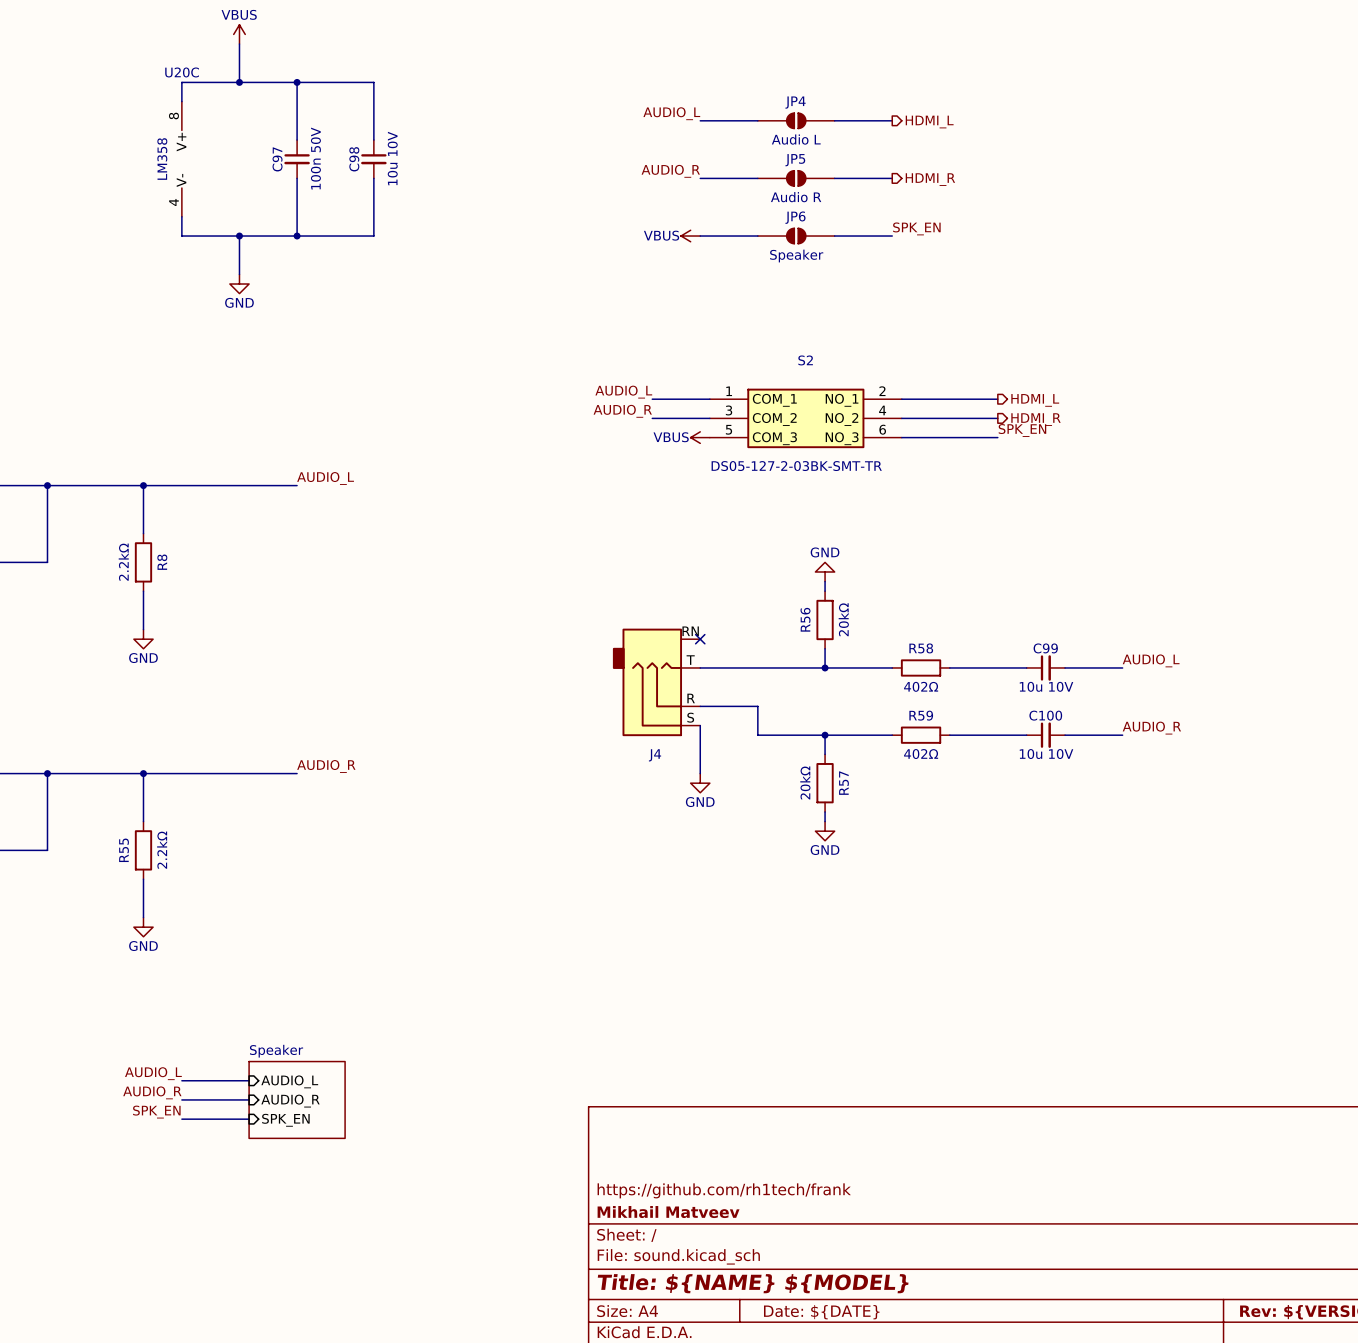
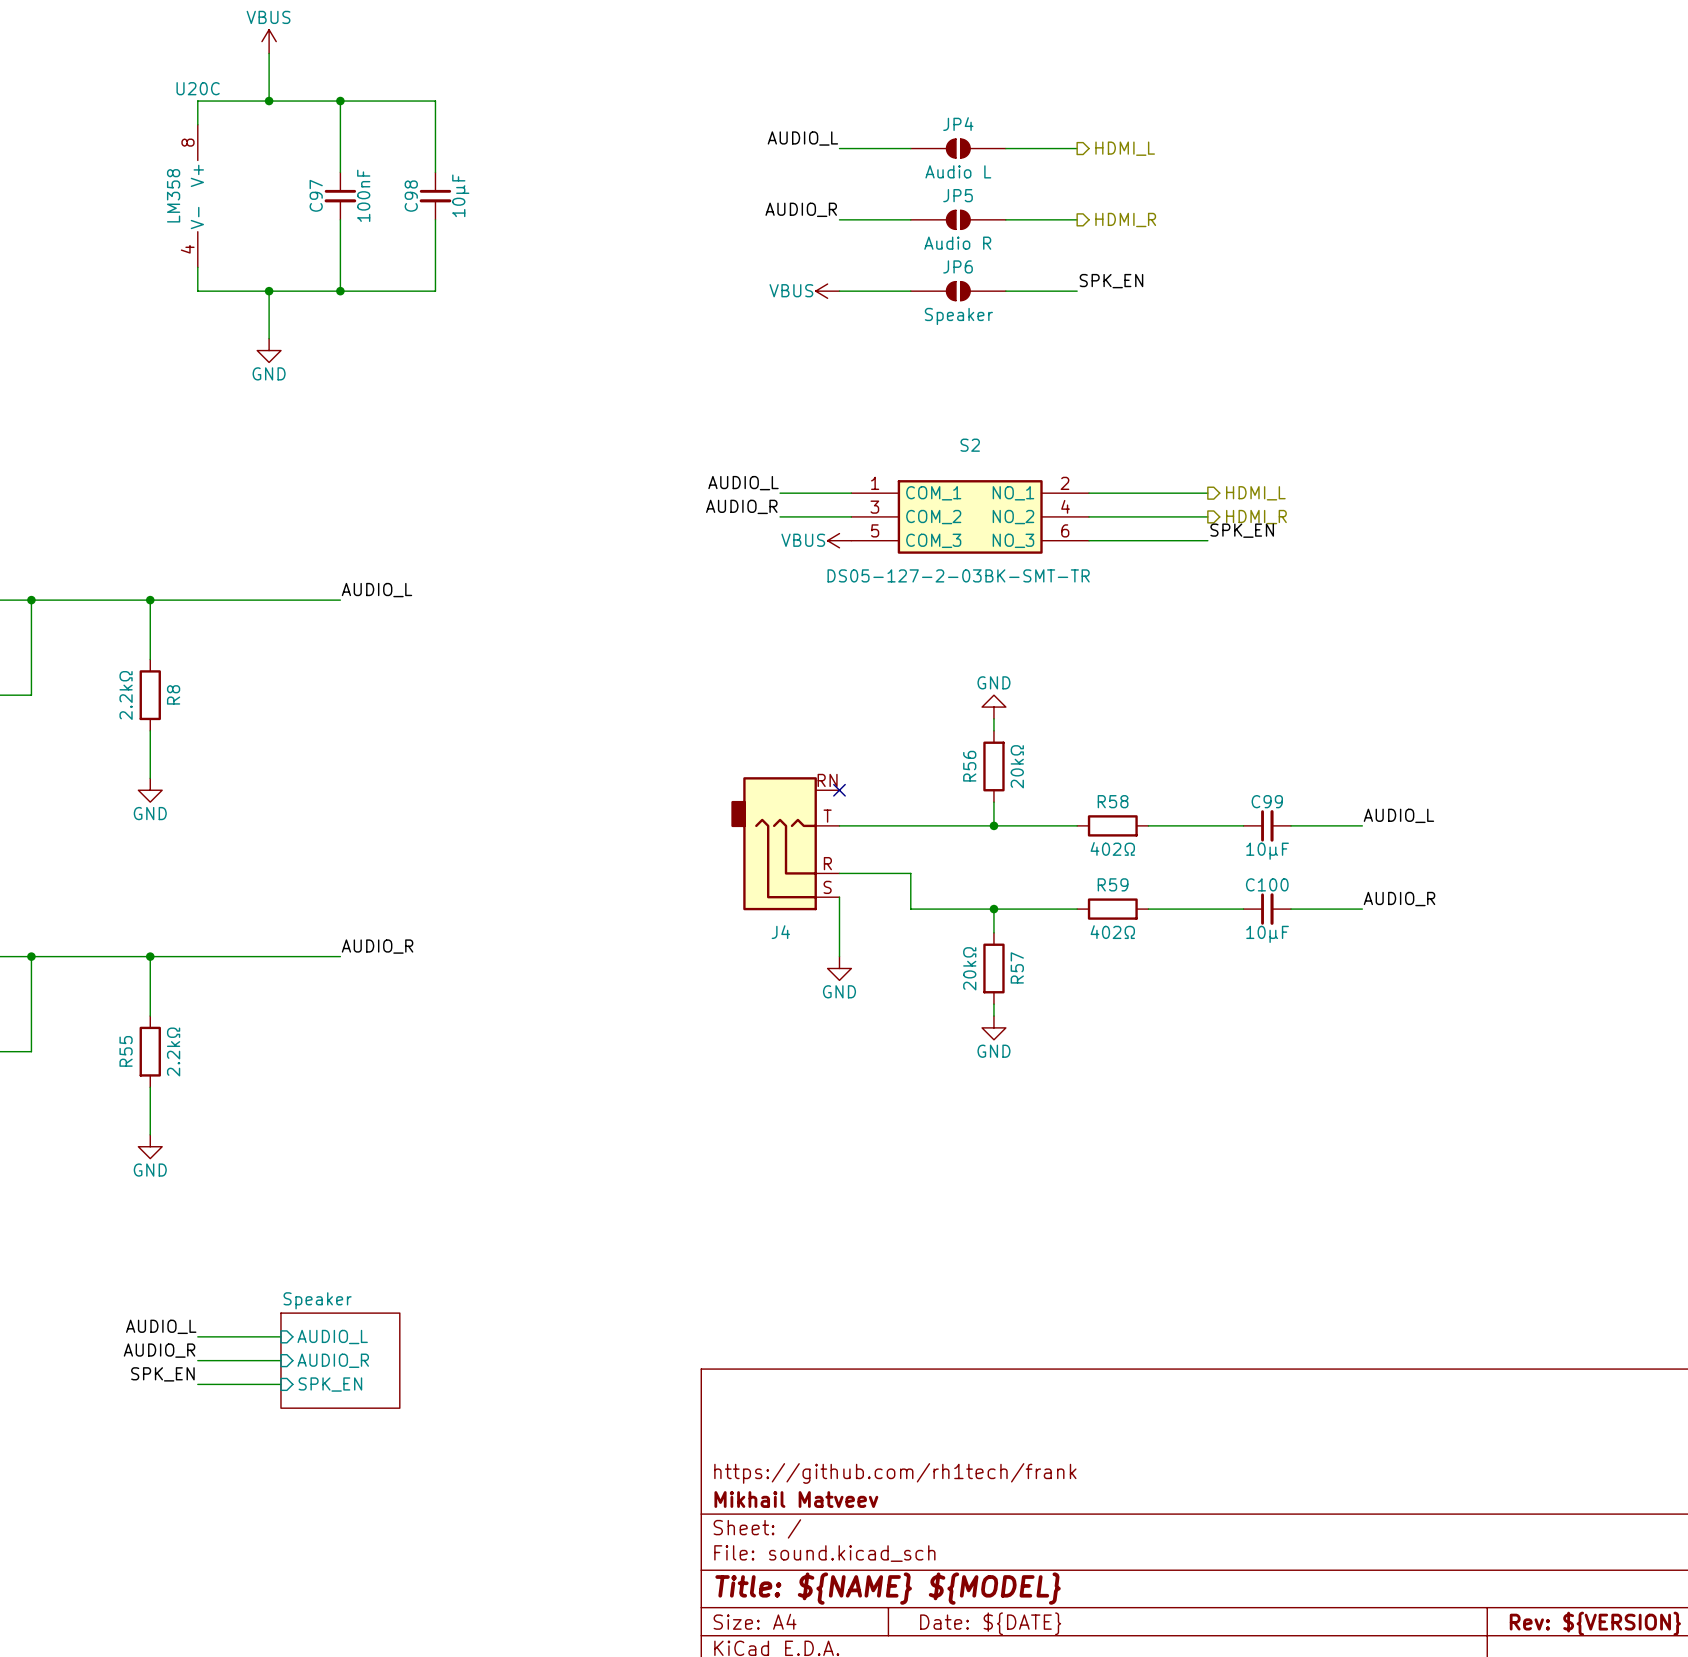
C97 value: 100n 50V (315, 158) -> 100nF (363, 195)
C98 value: 10u 10V (392, 158) -> 10µF (460, 195)
C99 value: 10u 10V (1046, 686) -> 10µF (1267, 851)
C100 value: 10u 10V (1046, 754) -> 10µF (1267, 934)

